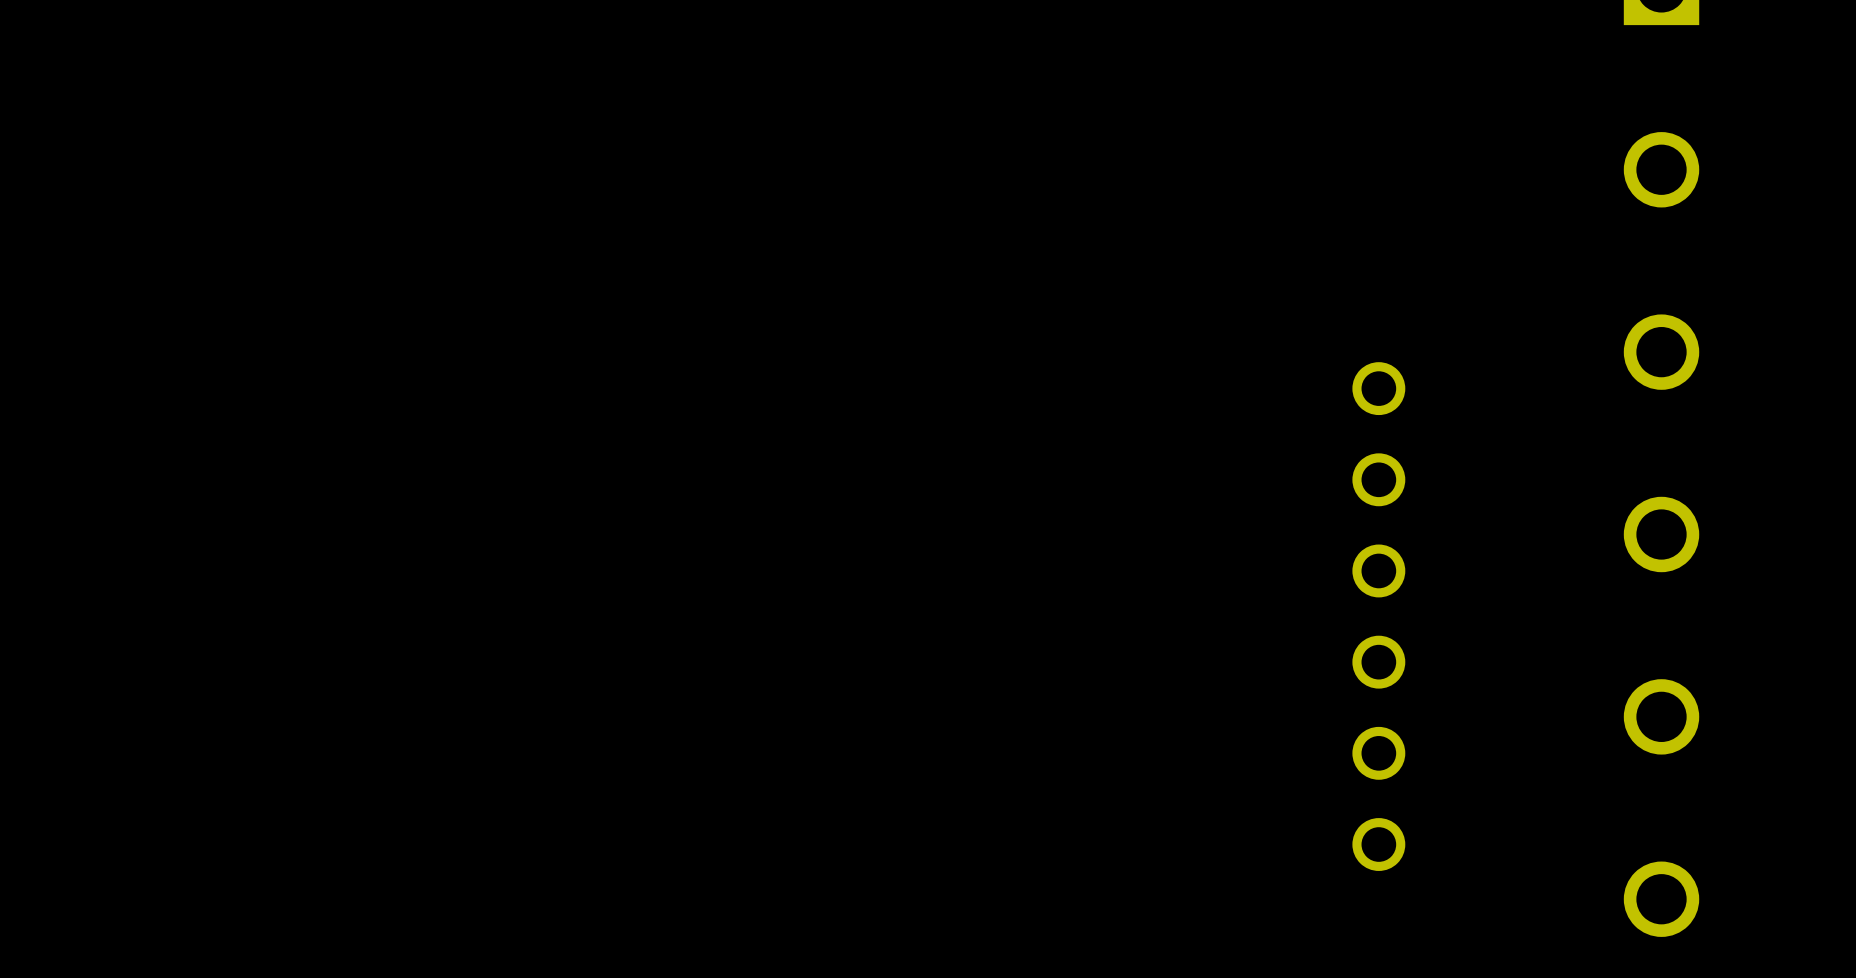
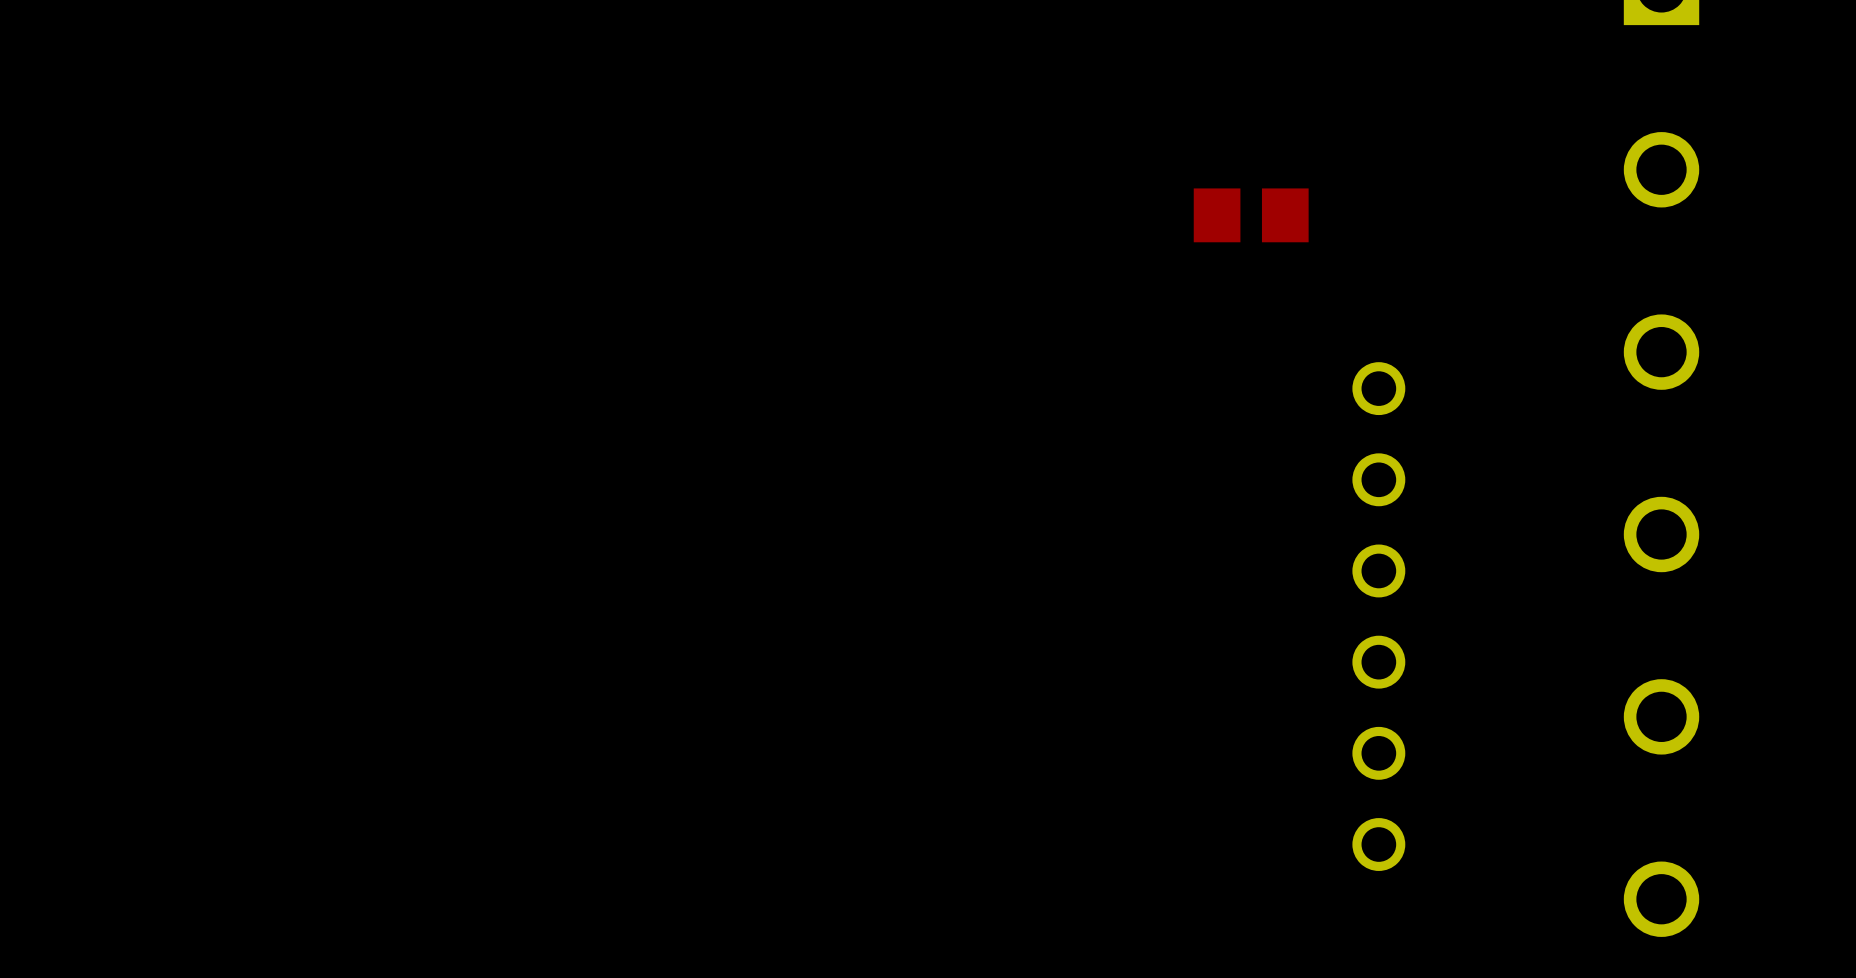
part: none -> (1251, 215)

